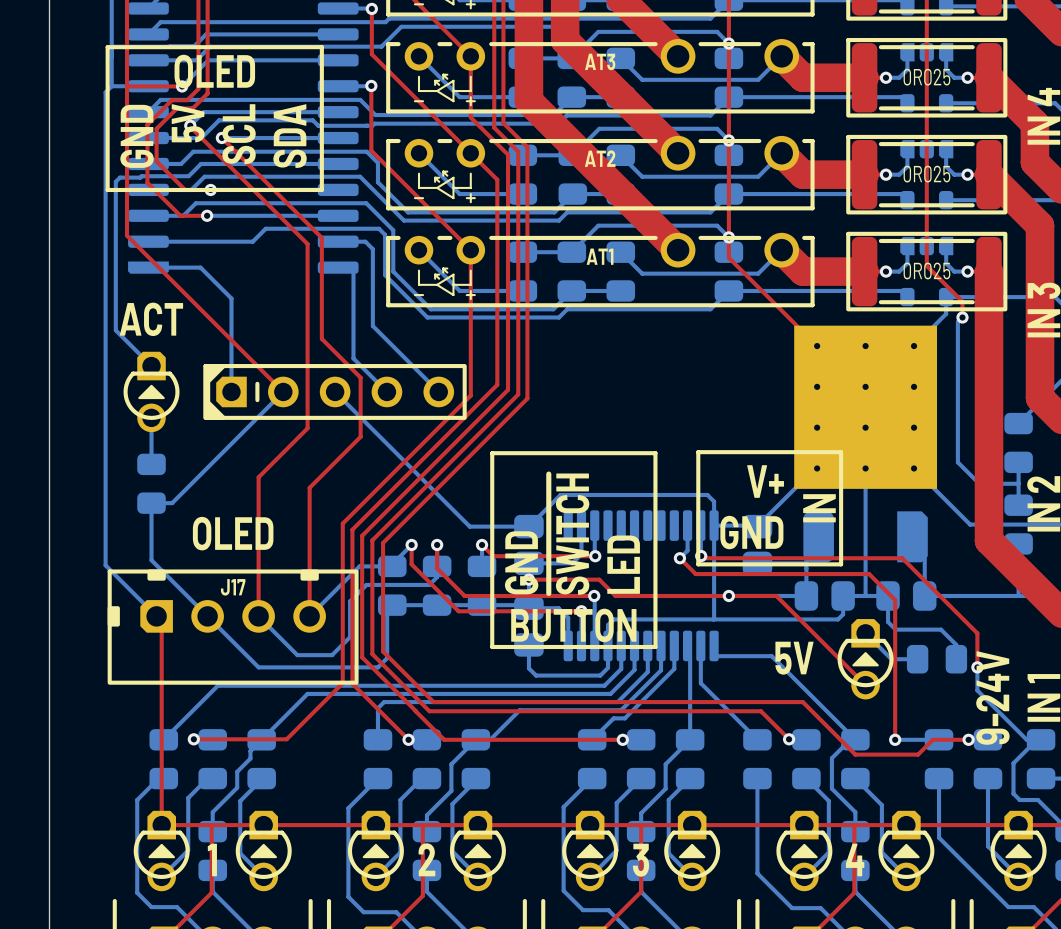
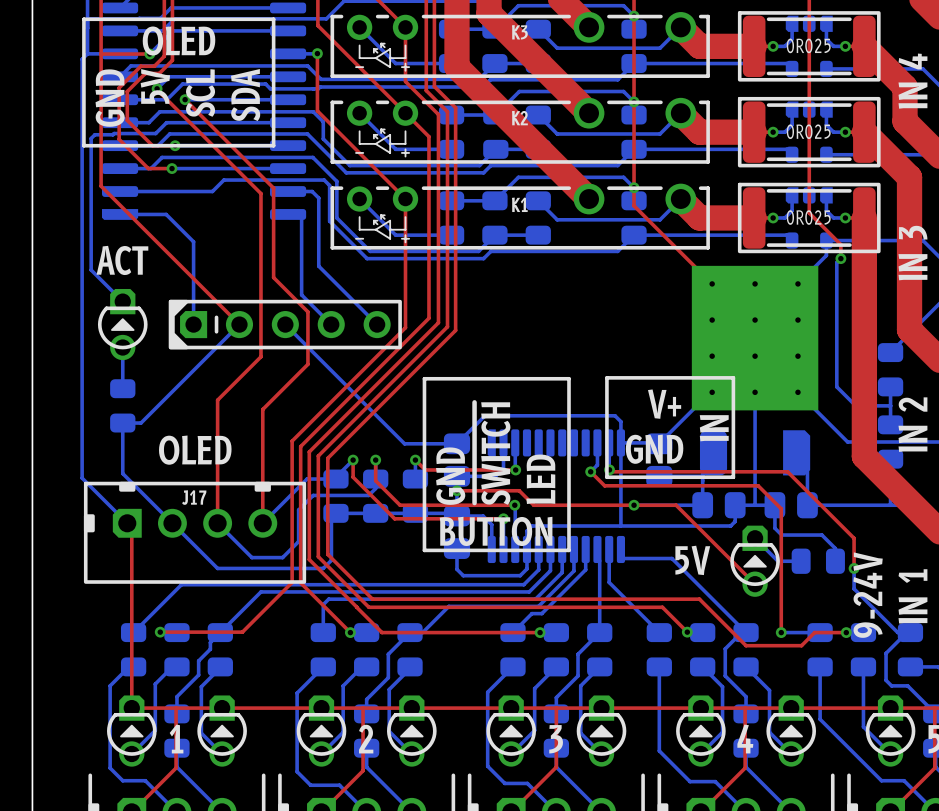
AT3 name: AT3 (600, 61) -> K3 (519, 32)
AT2 name: AT2 (600, 158) -> K2 (519, 118)
AT1 name: AT1 (600, 256) -> K1 (519, 204)

